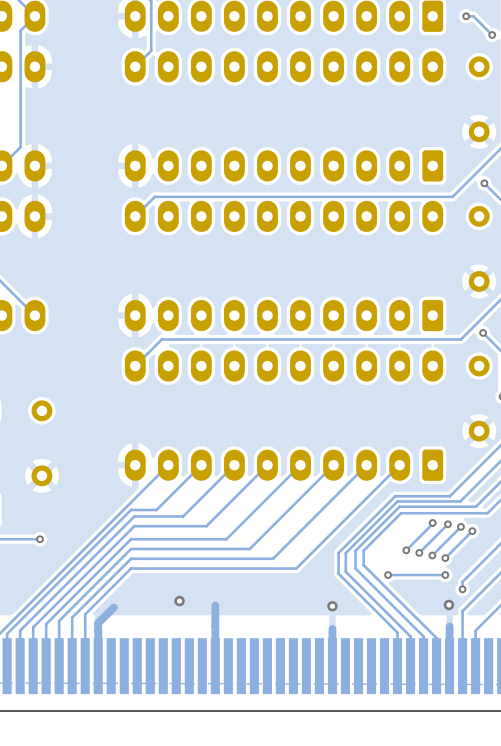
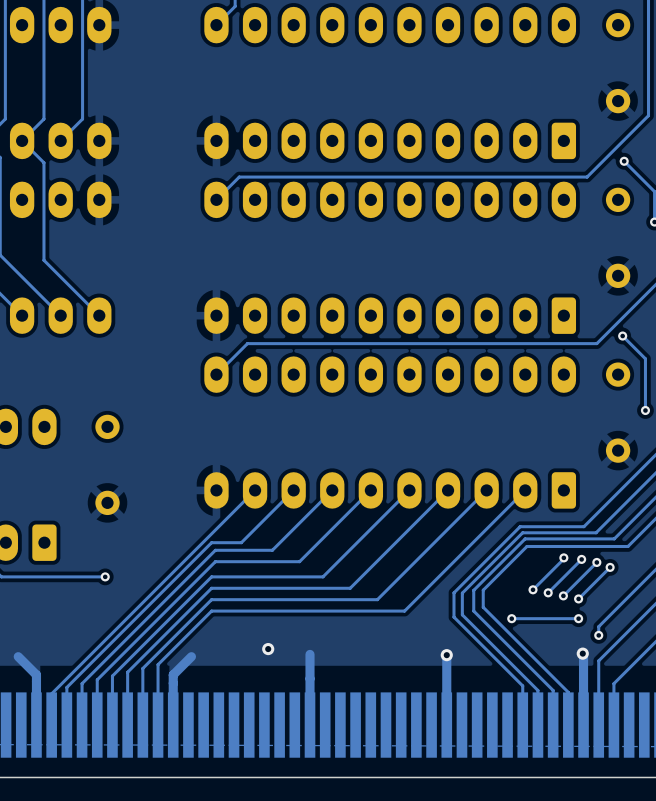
track: none -> (582, 653) (583, 678)
track: none -> (446, 655) (446, 681)

